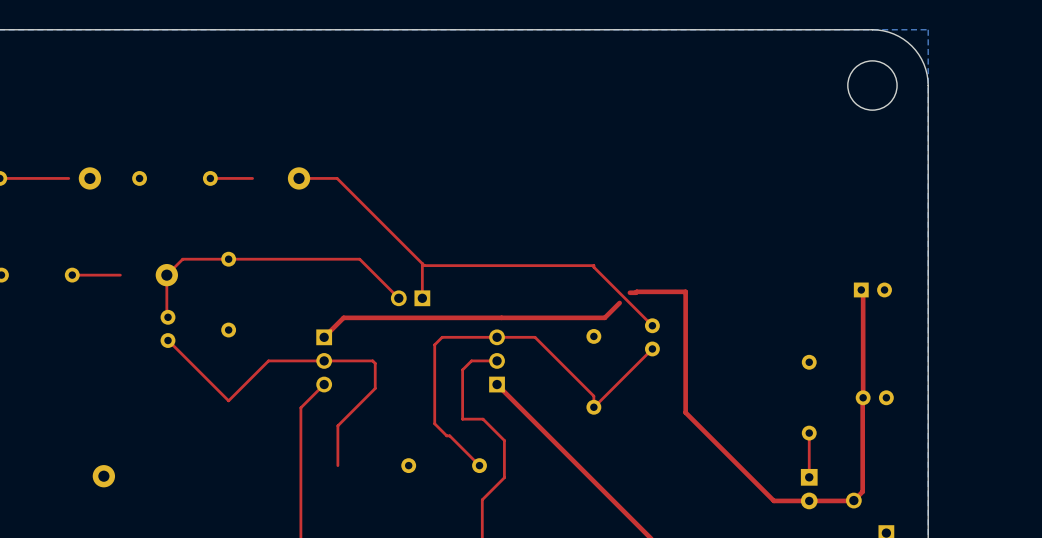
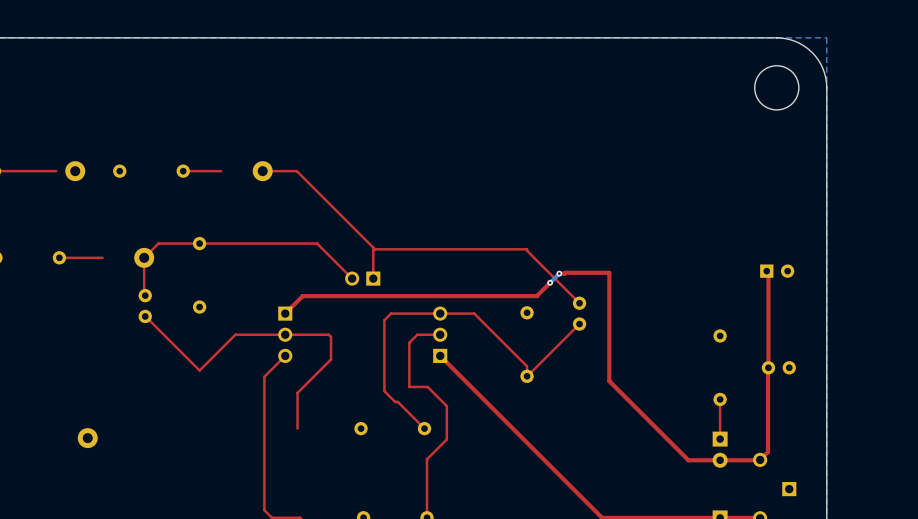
bottom track: none -> (559, 273) (550, 282)
via: none -> (559, 273)
via: none -> (550, 282)

